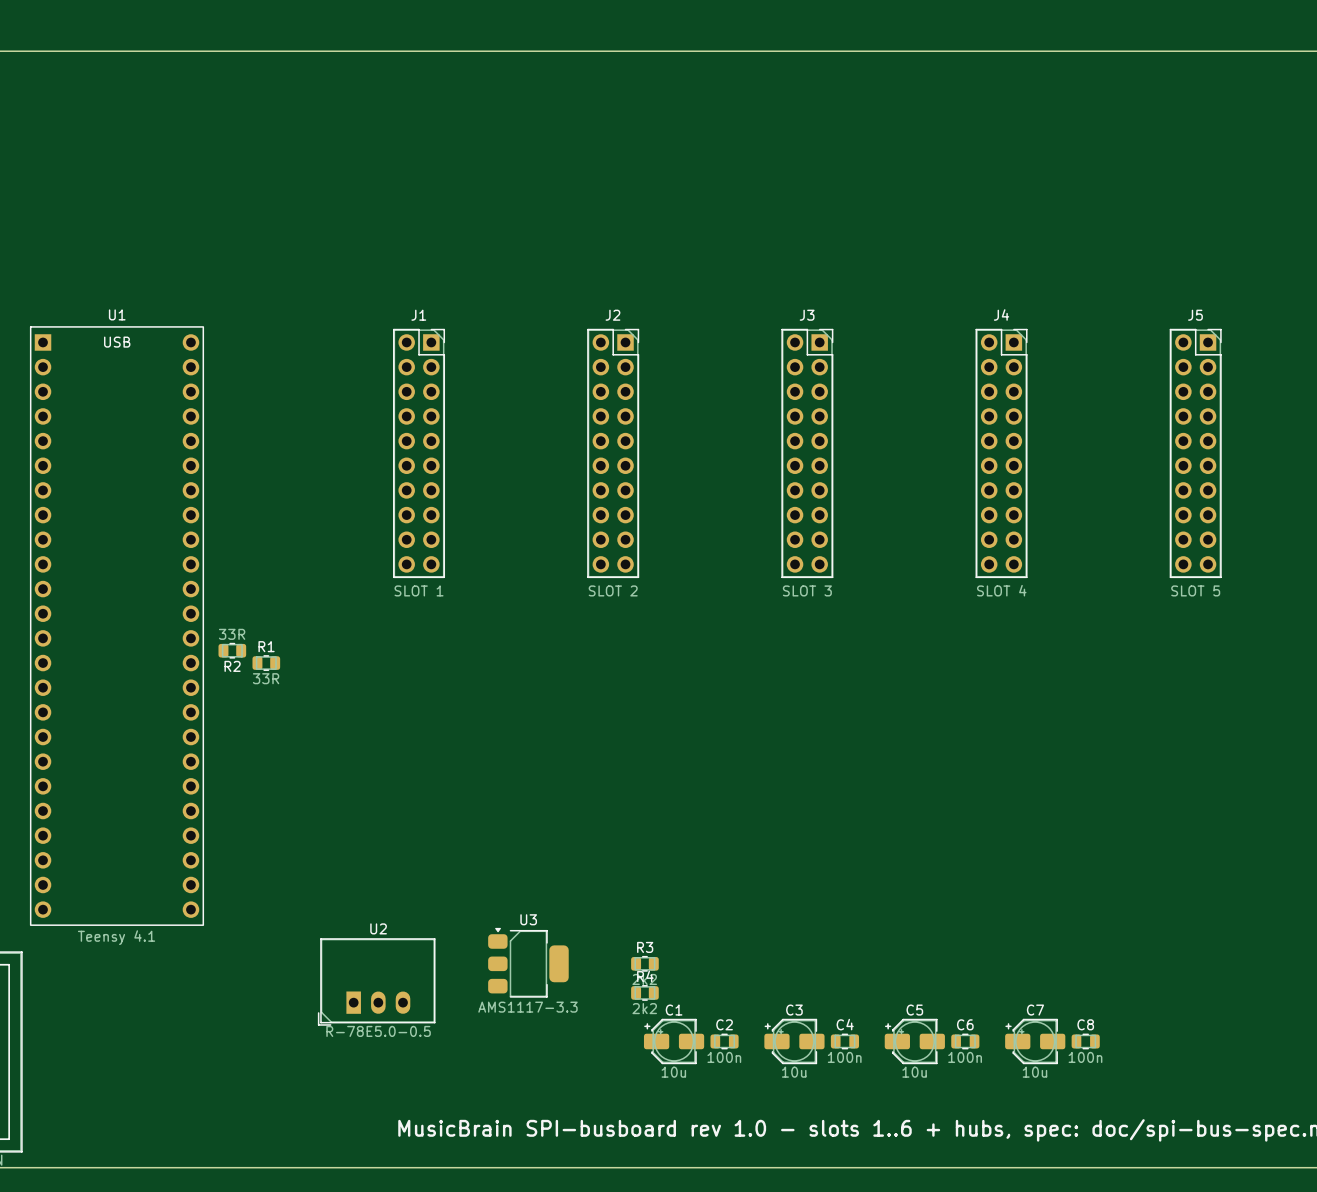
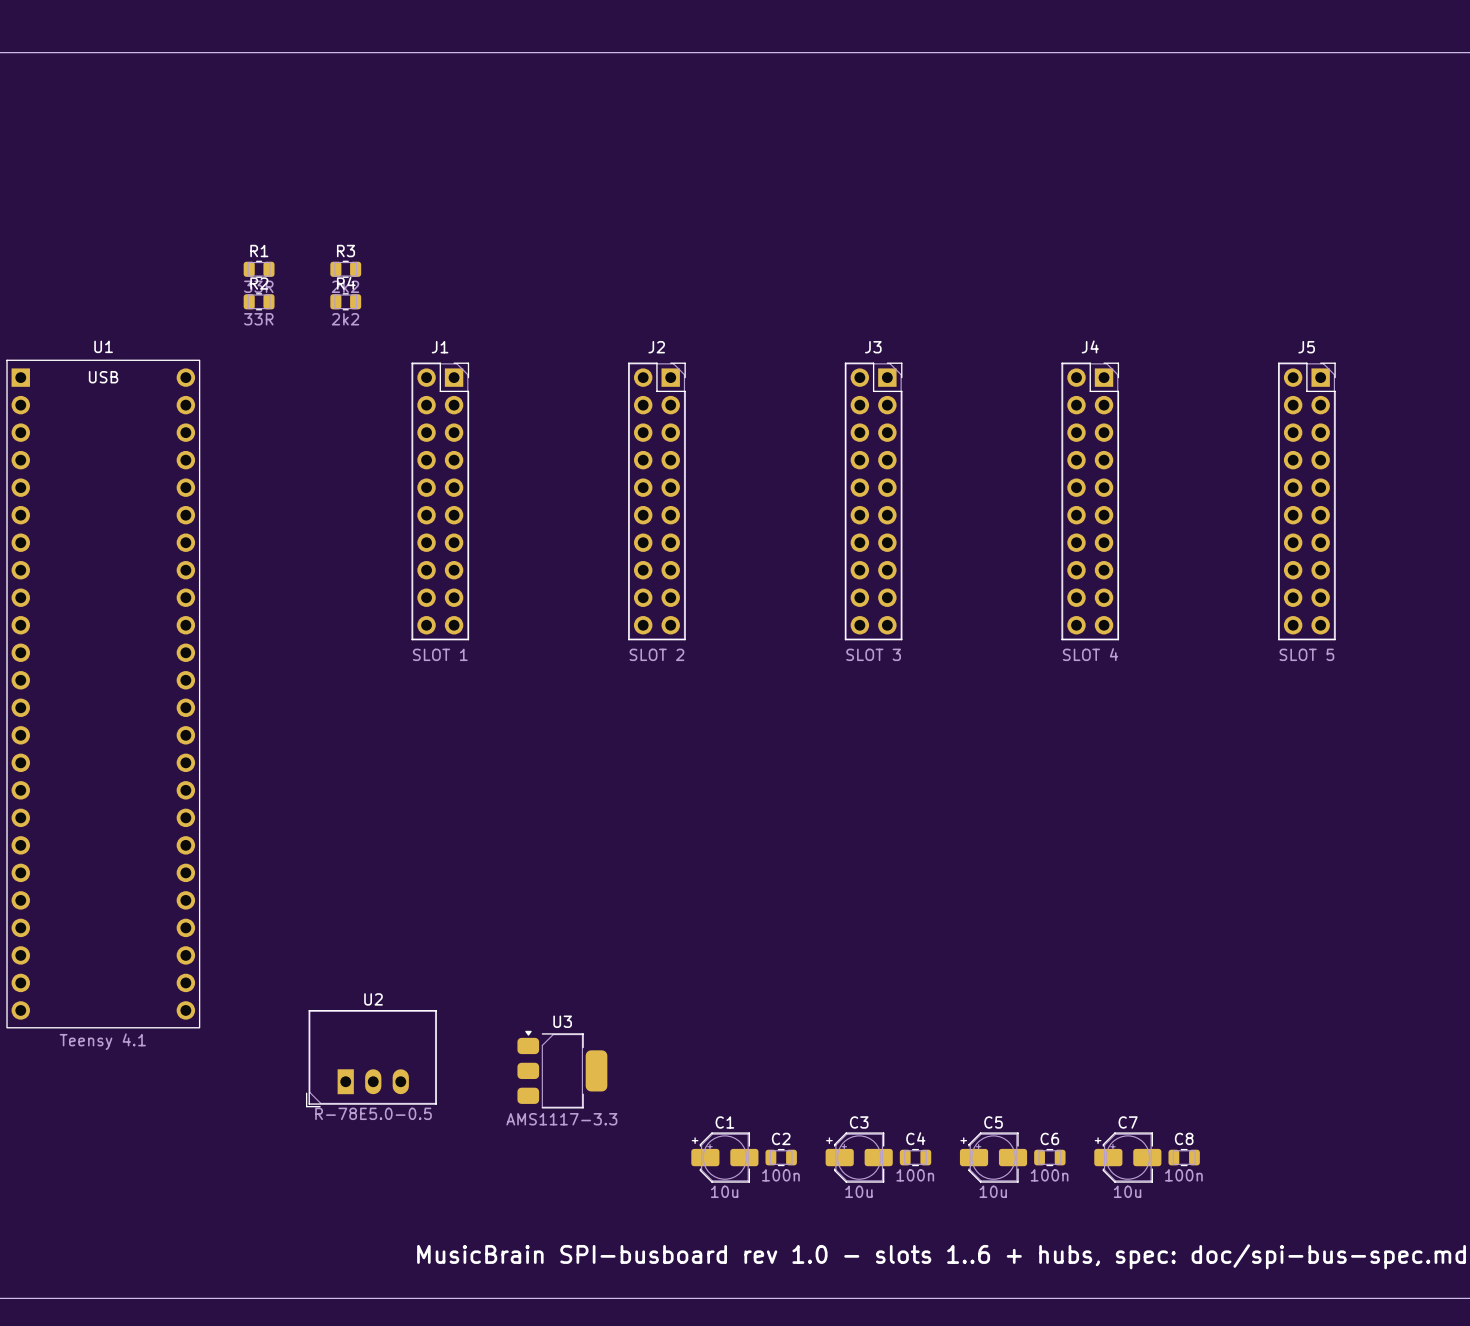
R2 value position: 33R (232, 634) -> 33R (258, 319)
R2 position: (232, 650) -> (259, 301)
R1 position: (266, 663) -> (259, 269)
R2 name position: R2 (232, 666) -> R2 (259, 283)
R3 position: (644, 963) -> (345, 269)
U2 position: (376, 981) -> (371, 1058)
R4 position: (644, 992) -> (345, 301)

